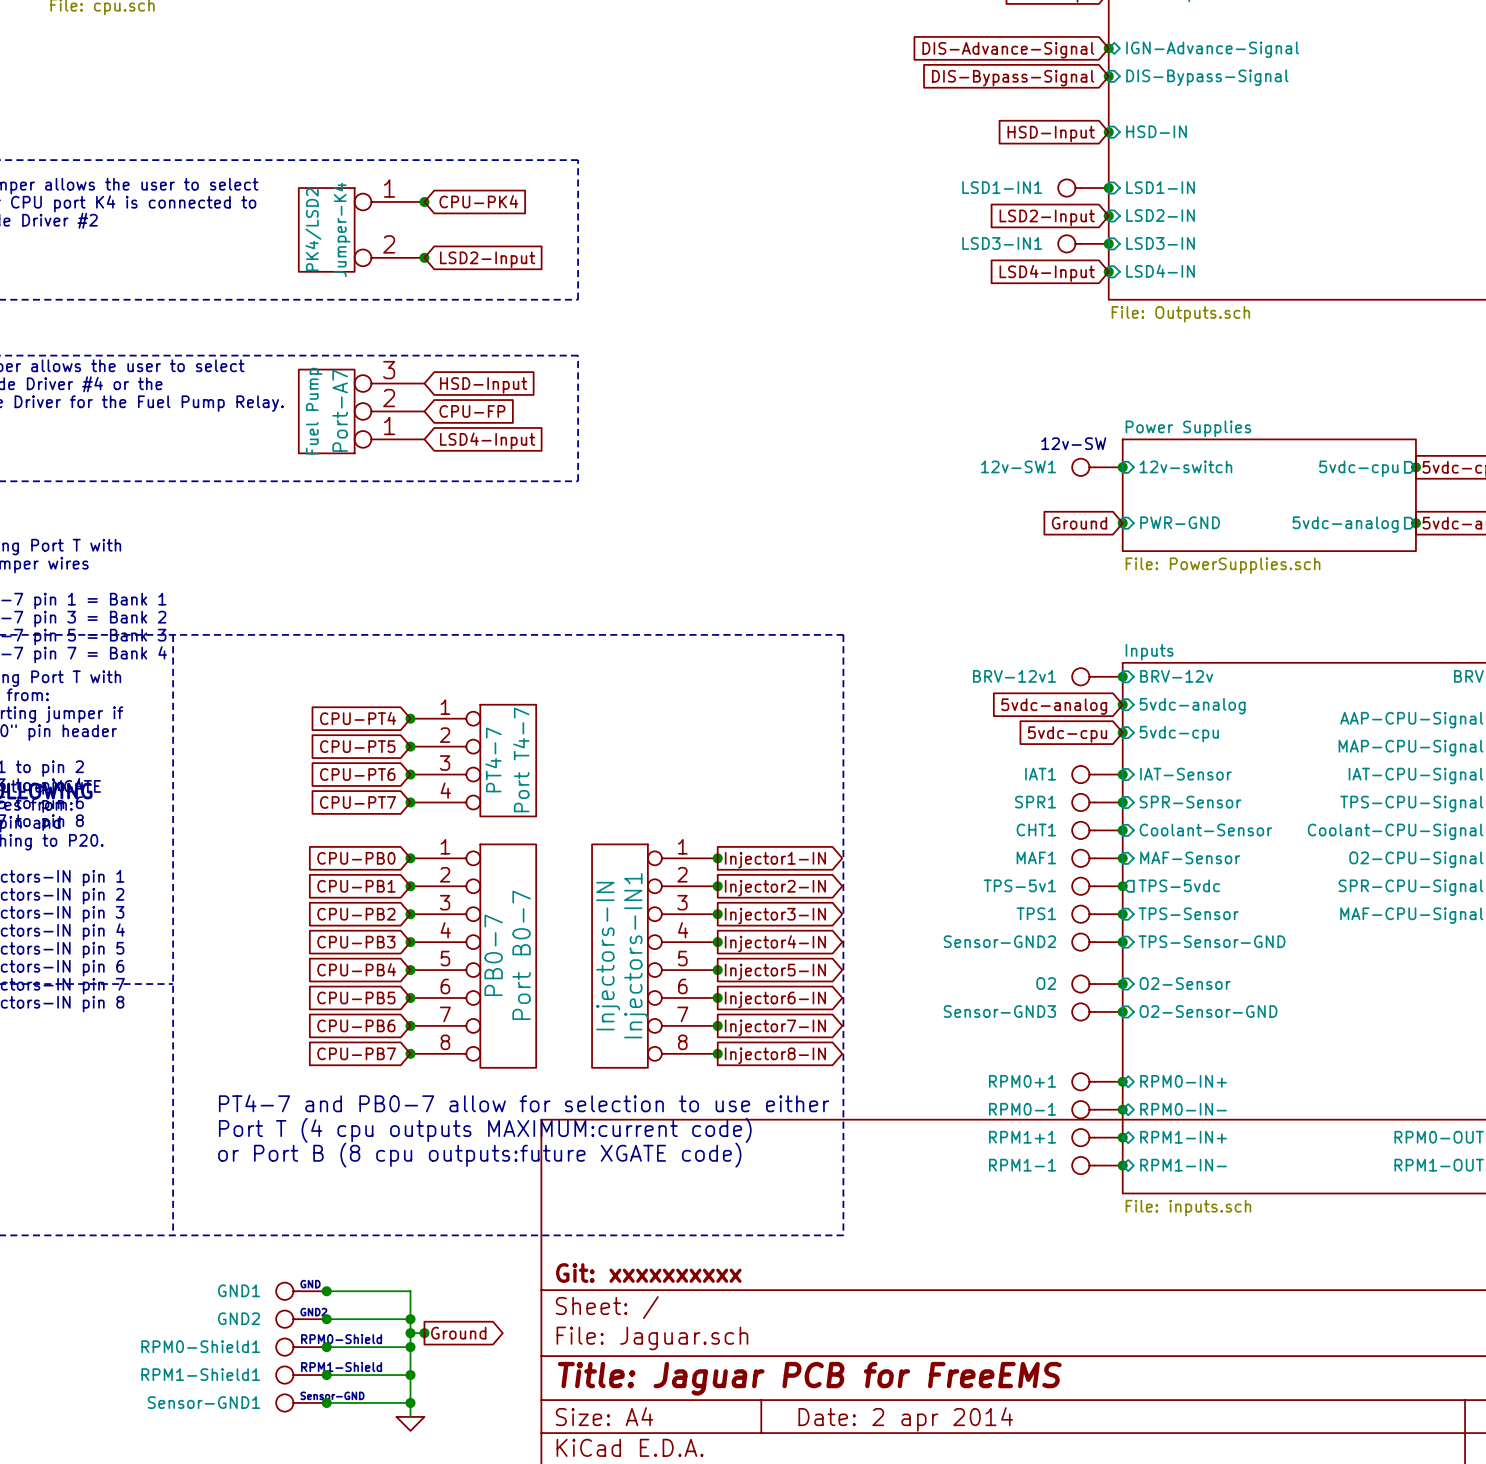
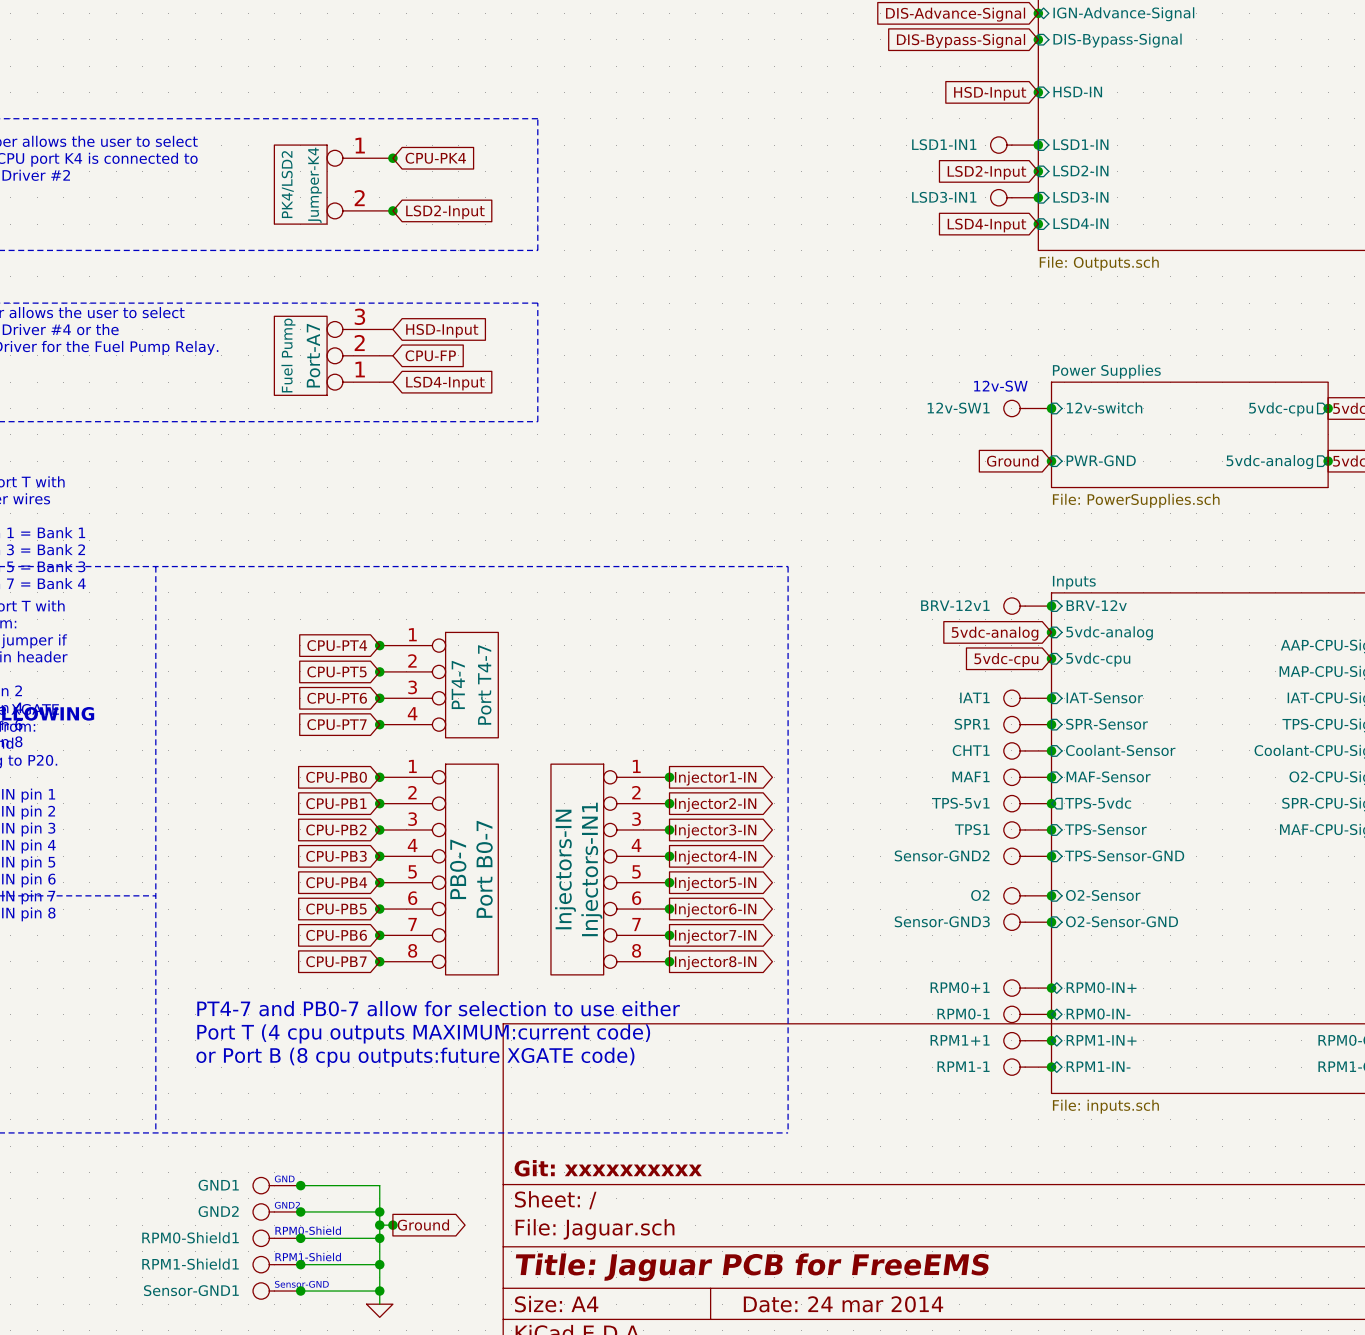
title block: Date: 2 apr 2014 (905, 1419) -> Date: 24 mar 2014 (843, 1304)

